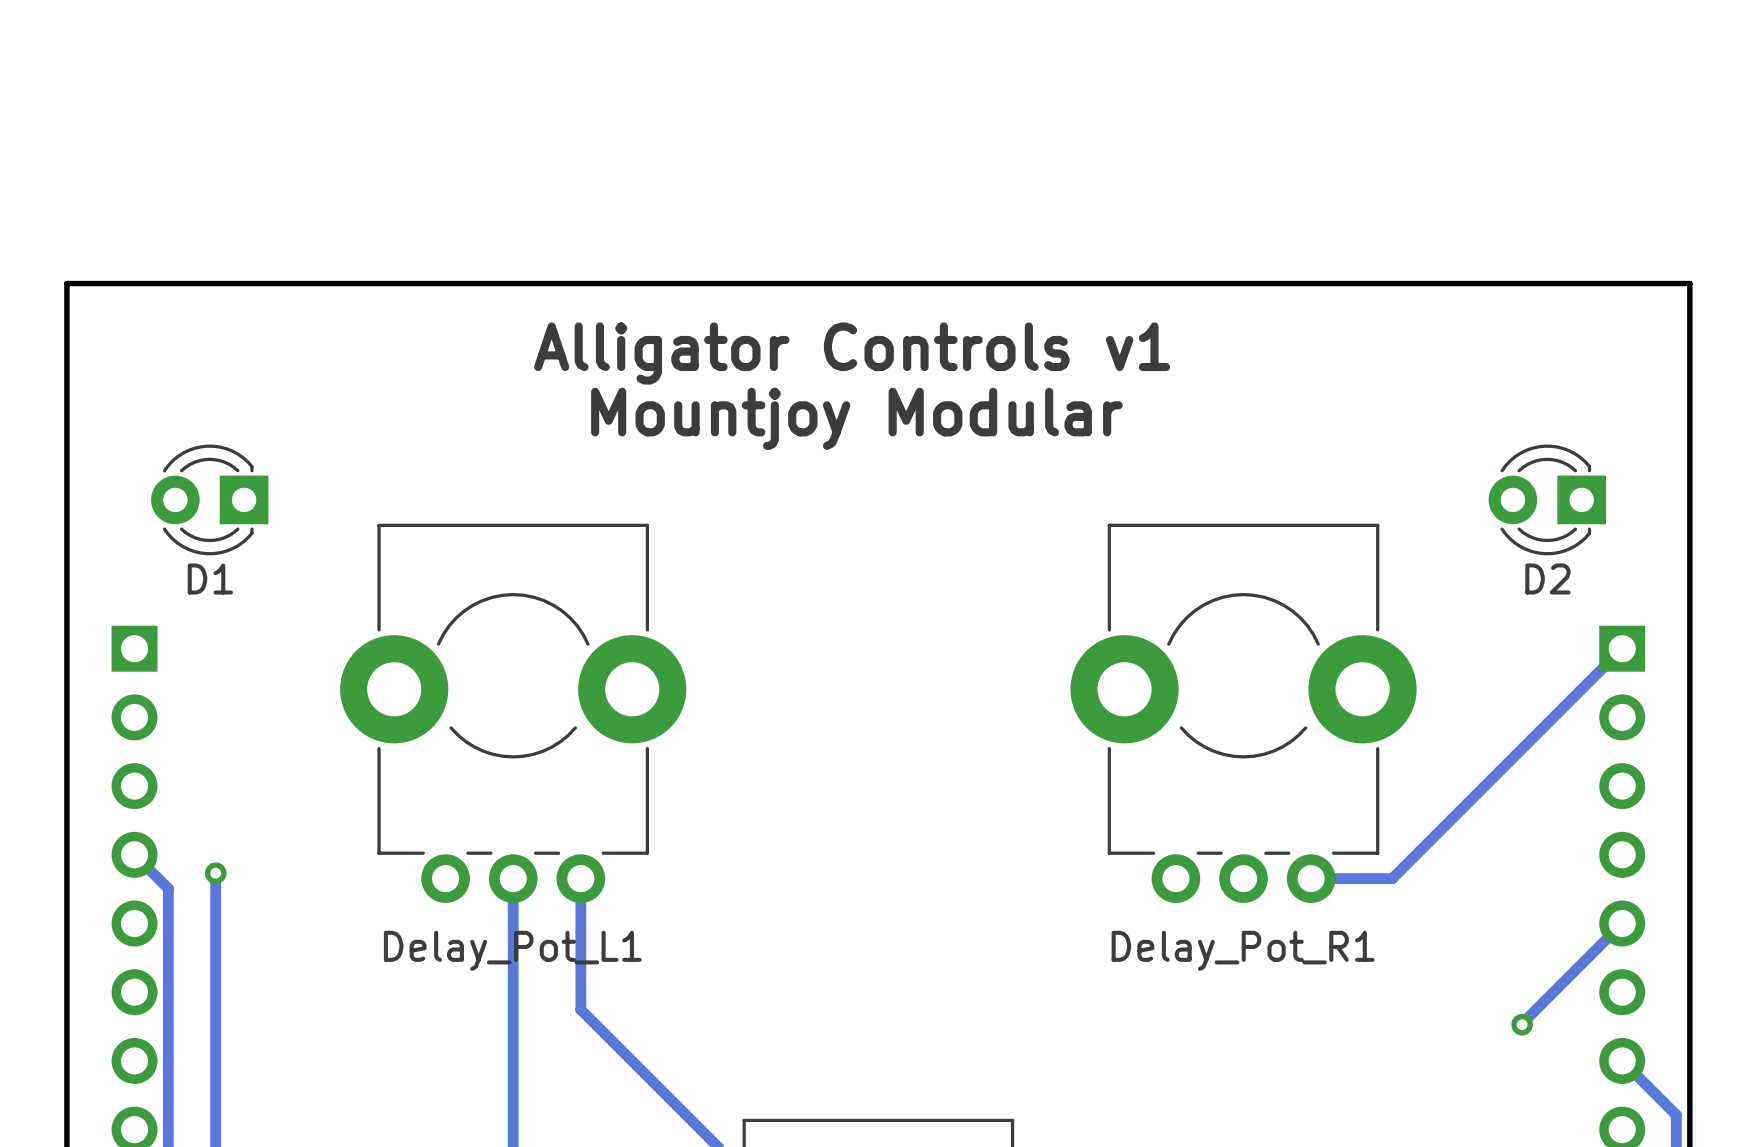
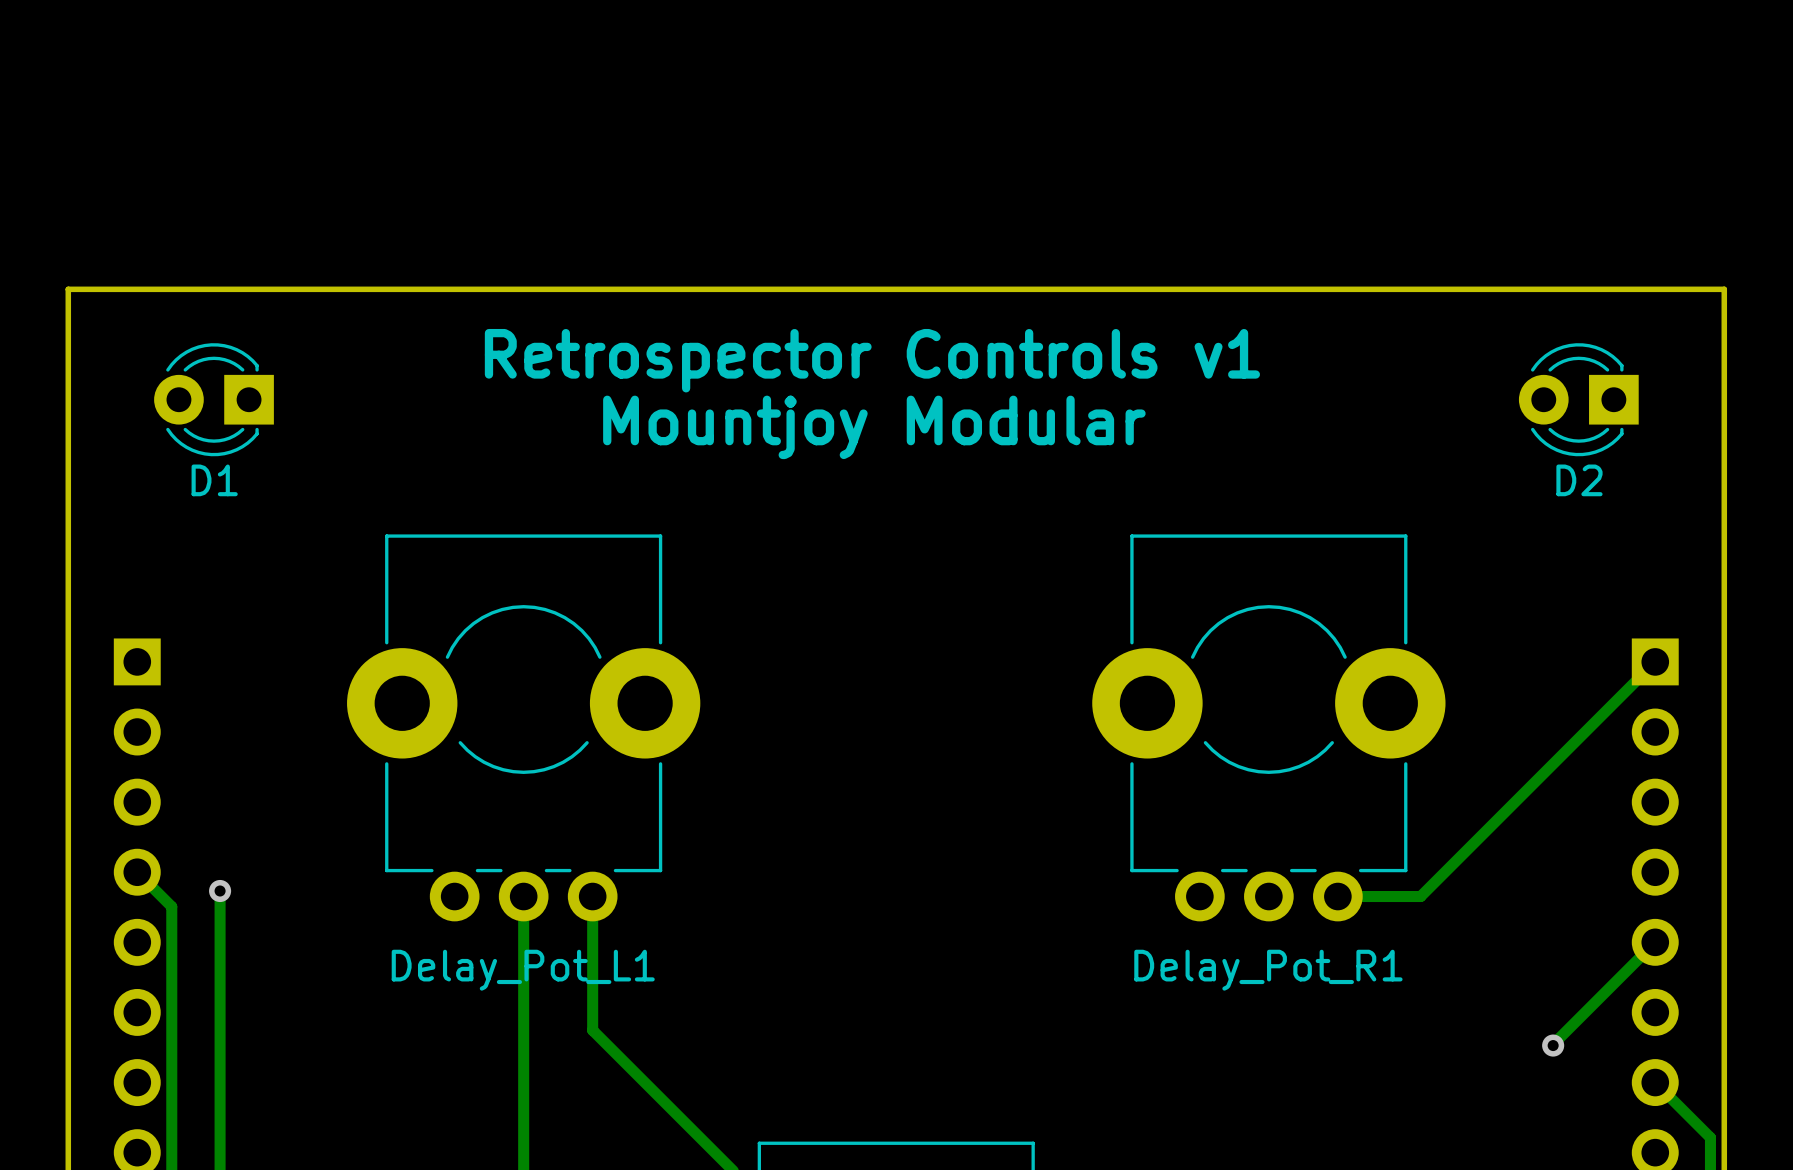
text: Alligator Controls v1 (852, 353) -> Retrospector Controls v1 (872, 360)
D1 position: (209, 499) -> (214, 399)
D2 position: (1547, 499) -> (1578, 399)

